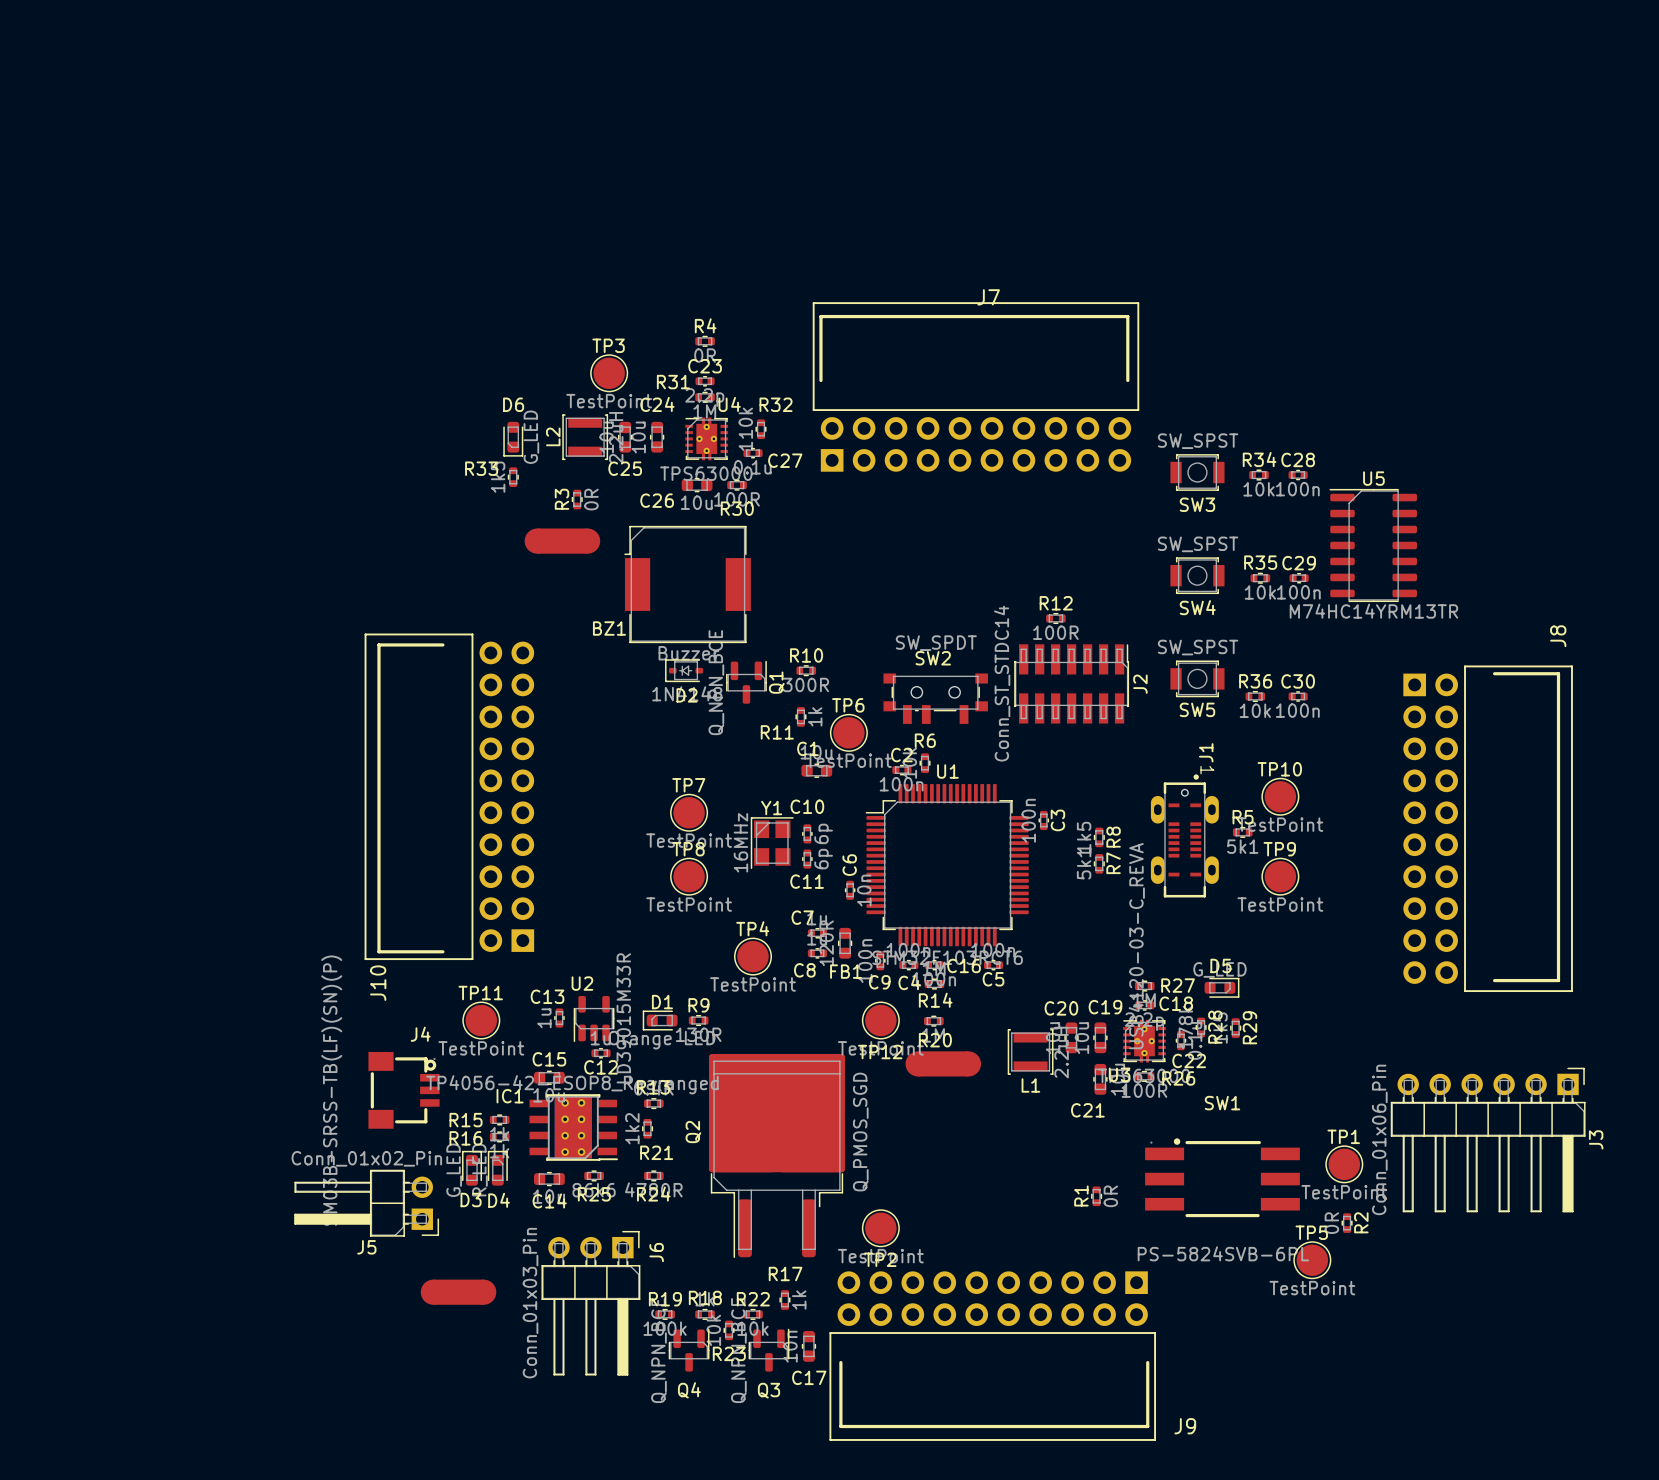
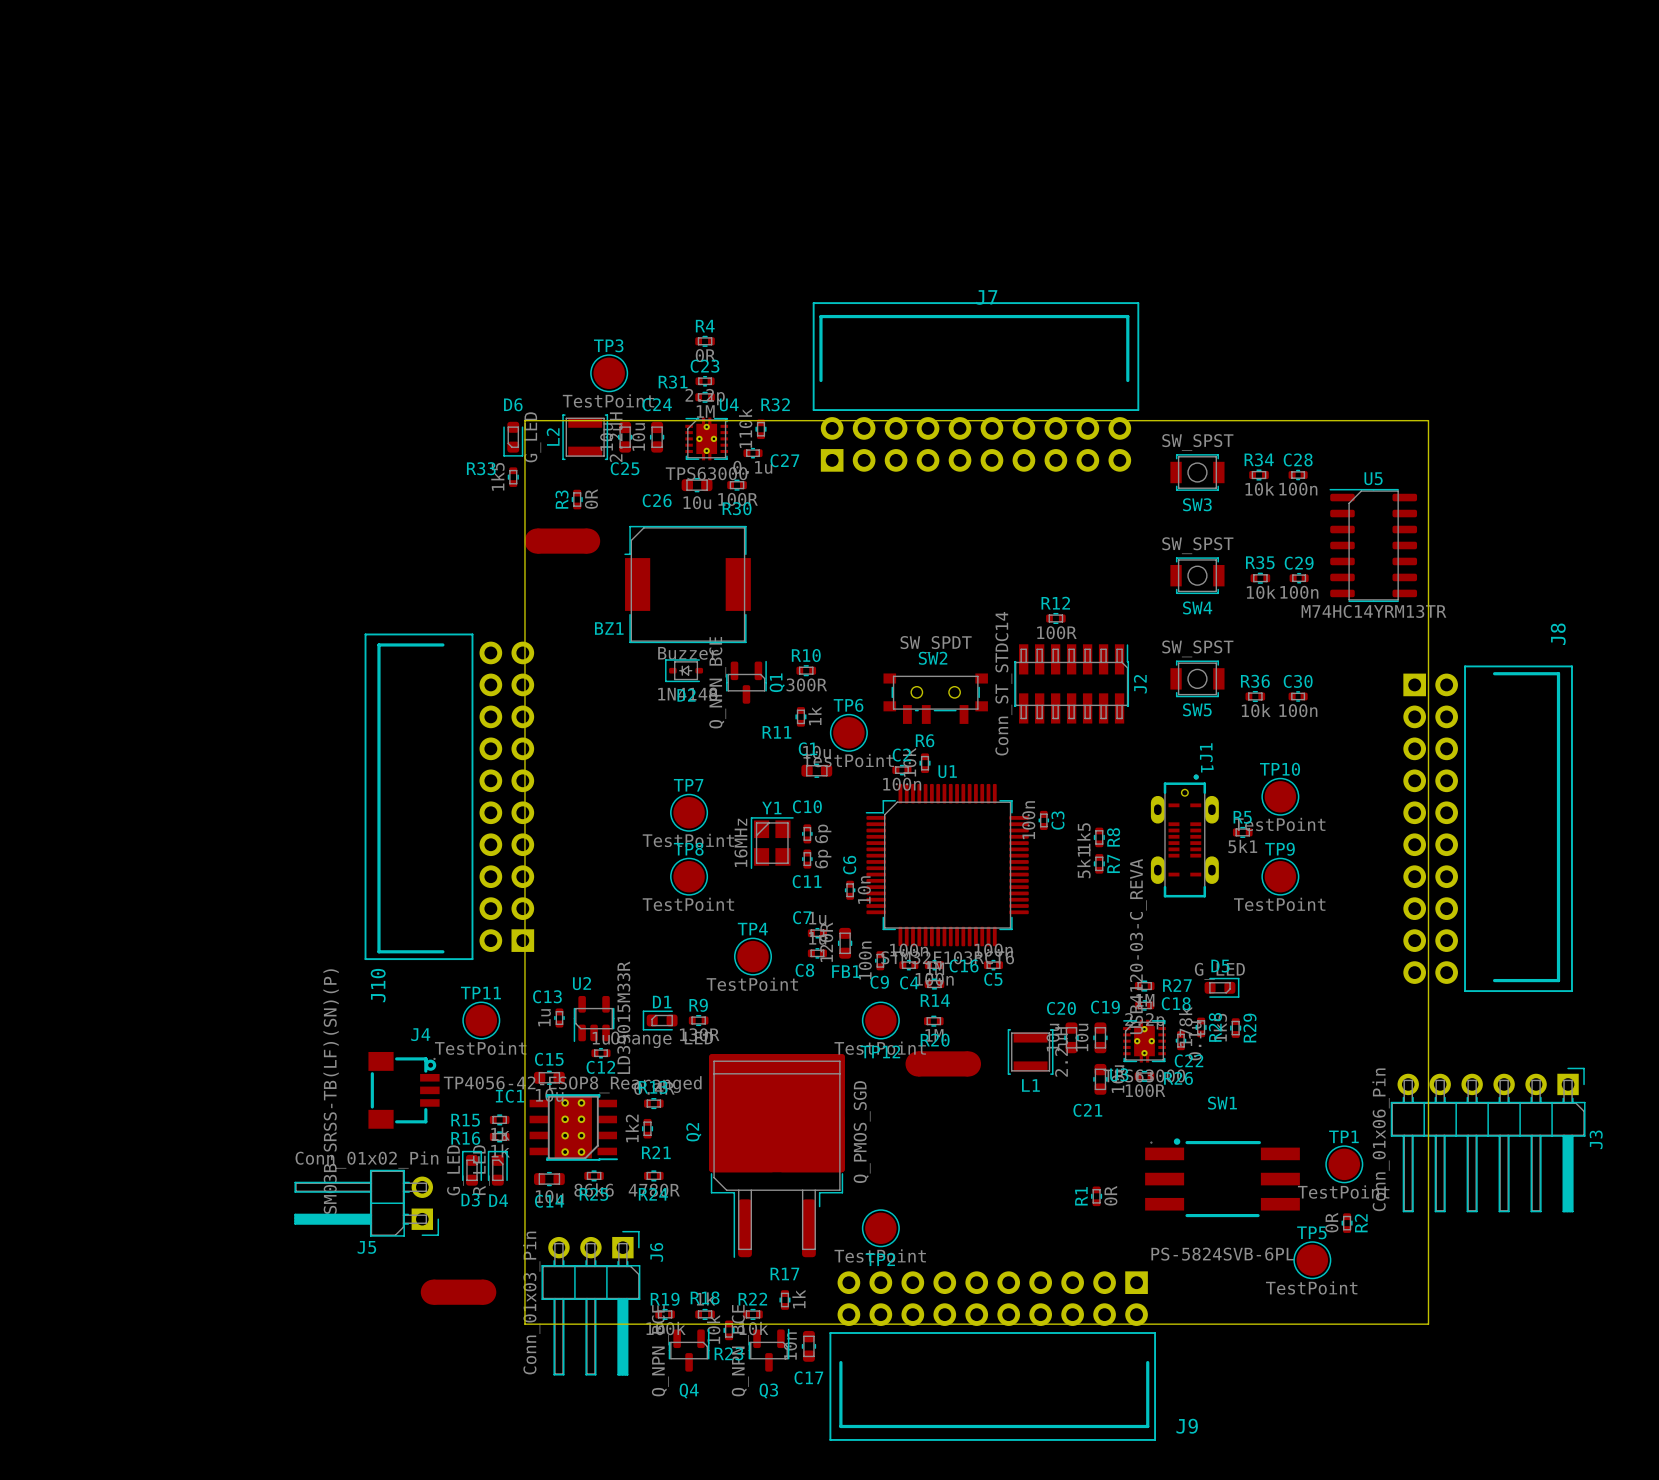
board edge: none -> (524, 420) (1428, 420) (1428, 1324) (524, 1324) (524, 420)

